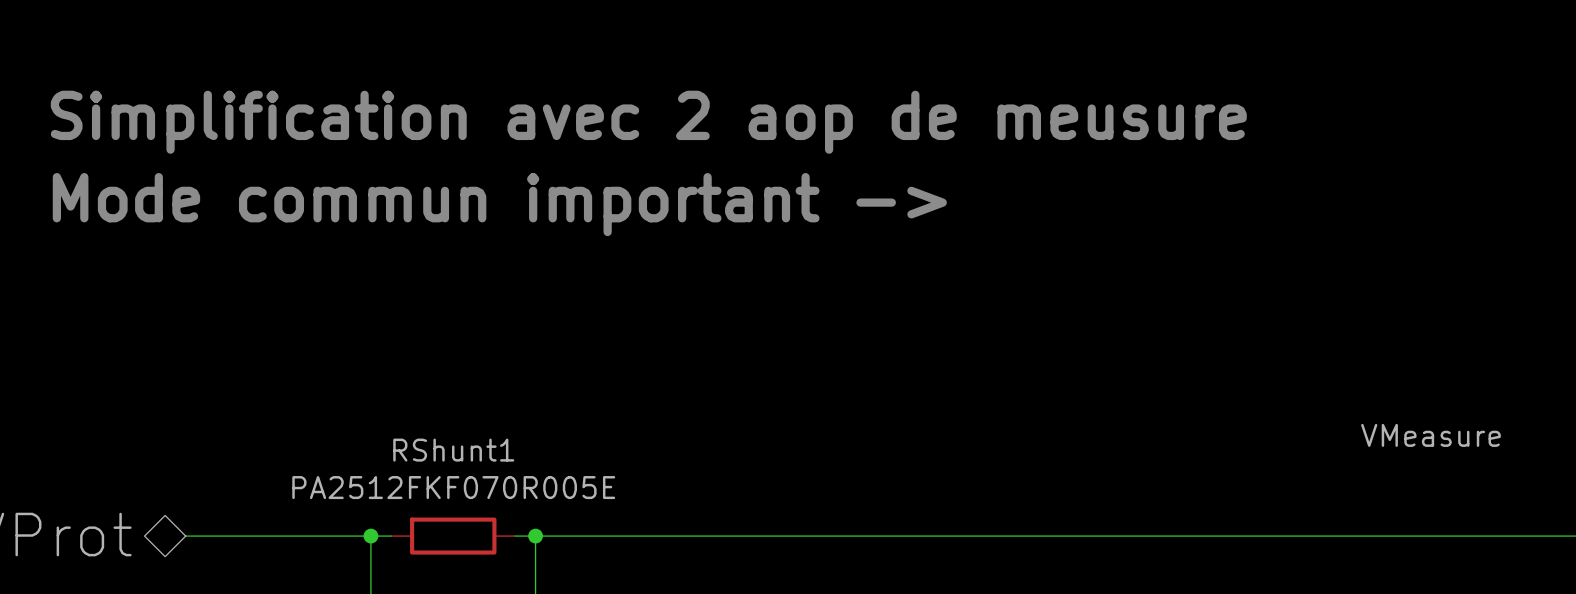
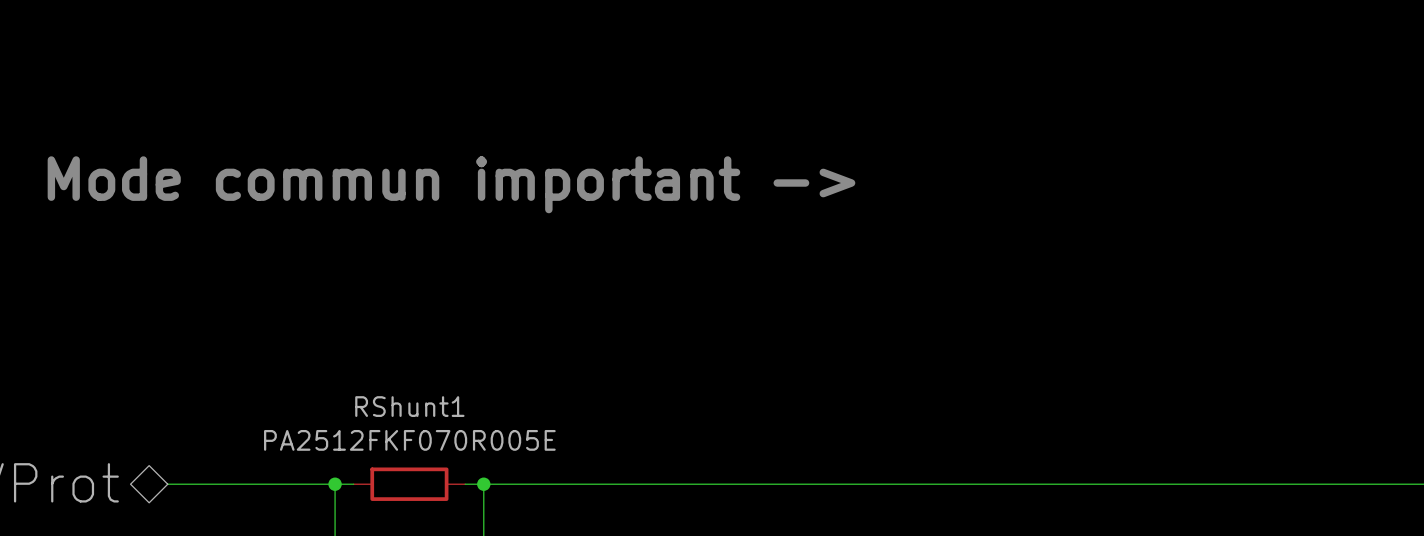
text: Simplification avec 2 aop de meusure (648, 122) -> none
label: VMeasure (1430, 435) -> none

